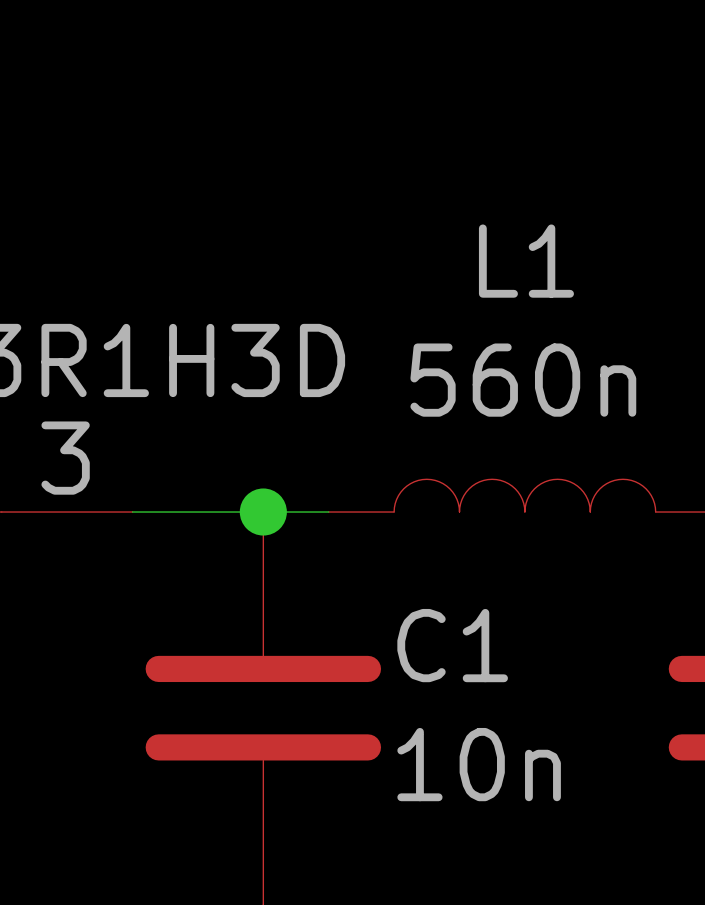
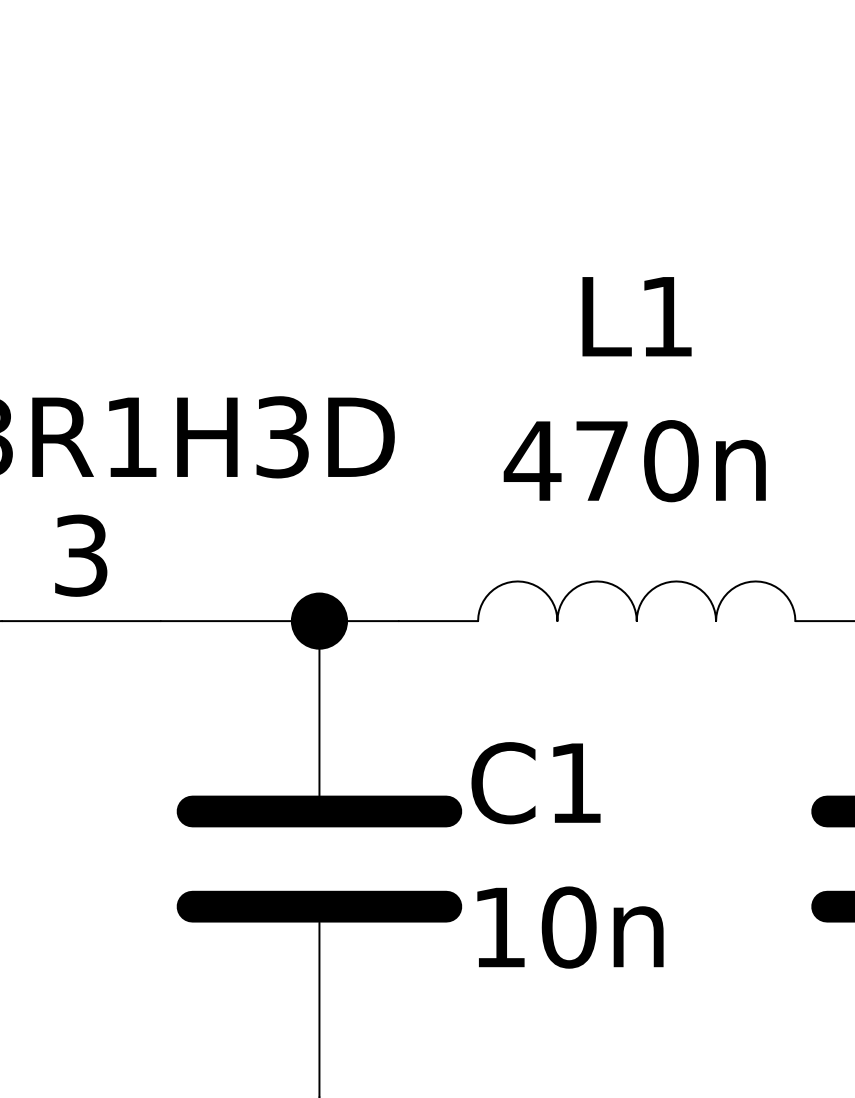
L1 value: 560n (523, 380) -> 470n (634, 461)

